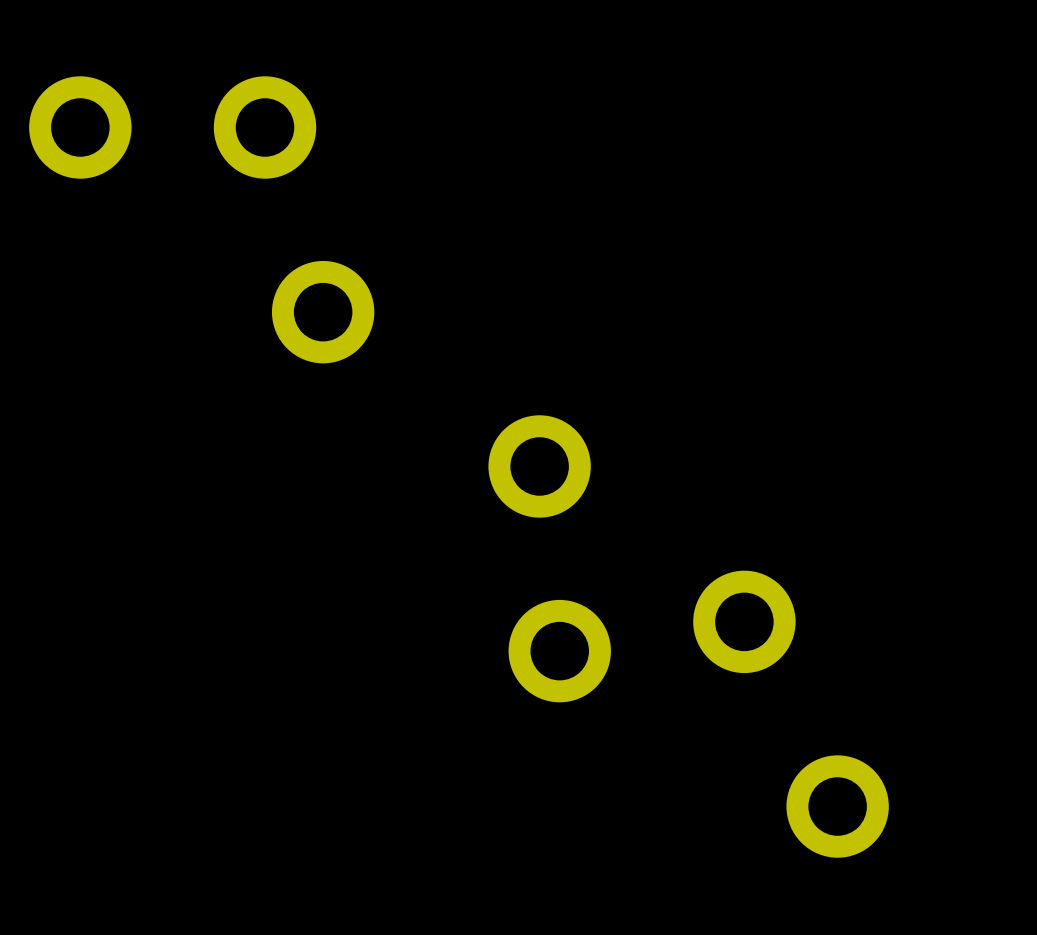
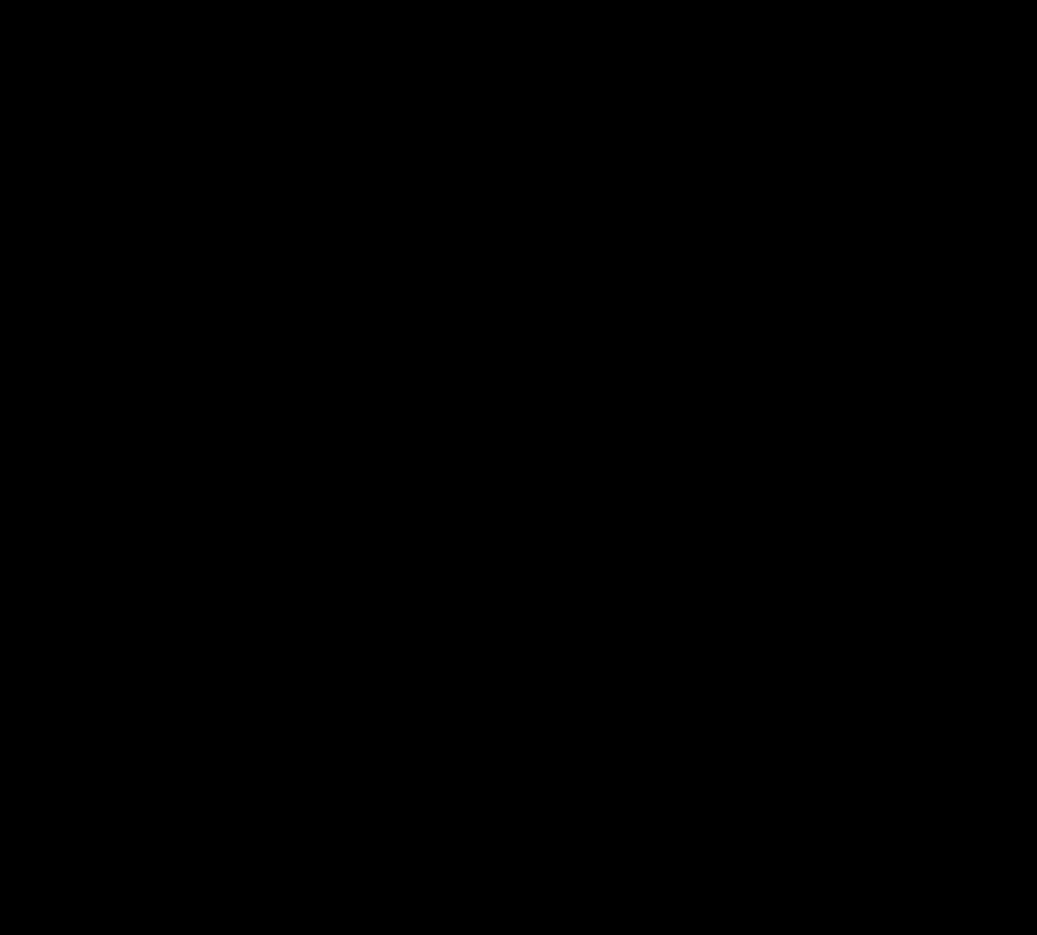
part: (80, 127) -> none
part: (265, 127) -> none
part: (323, 312) -> none
part: (539, 466) -> none
part: (744, 621) -> none
part: (559, 651) -> none
part: (837, 806) -> none

